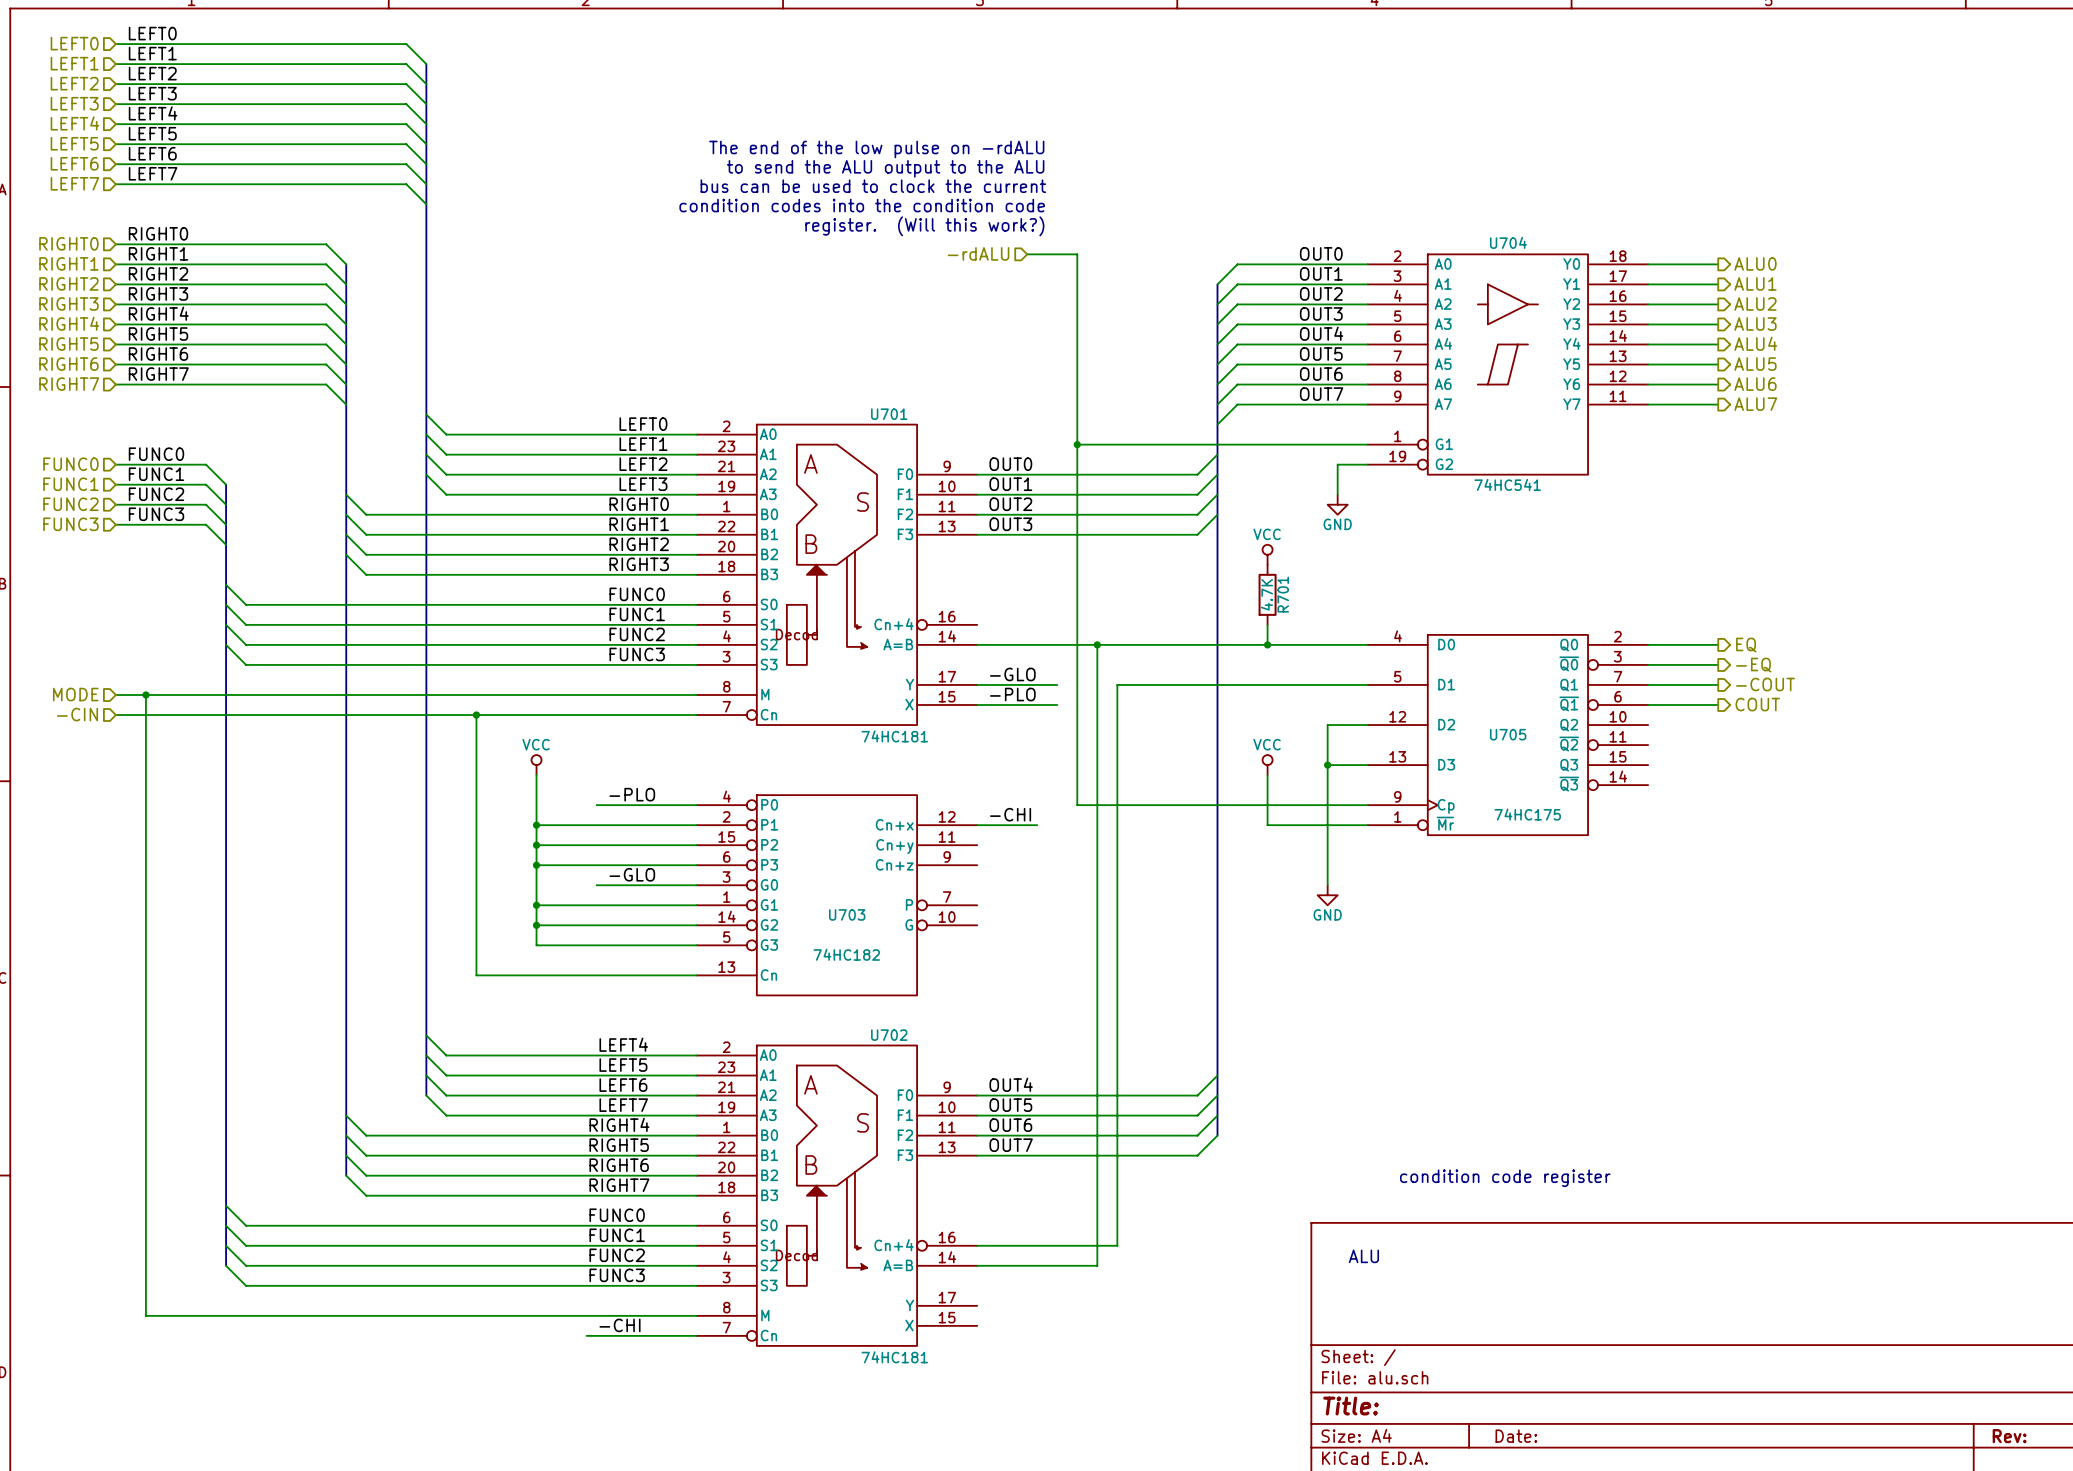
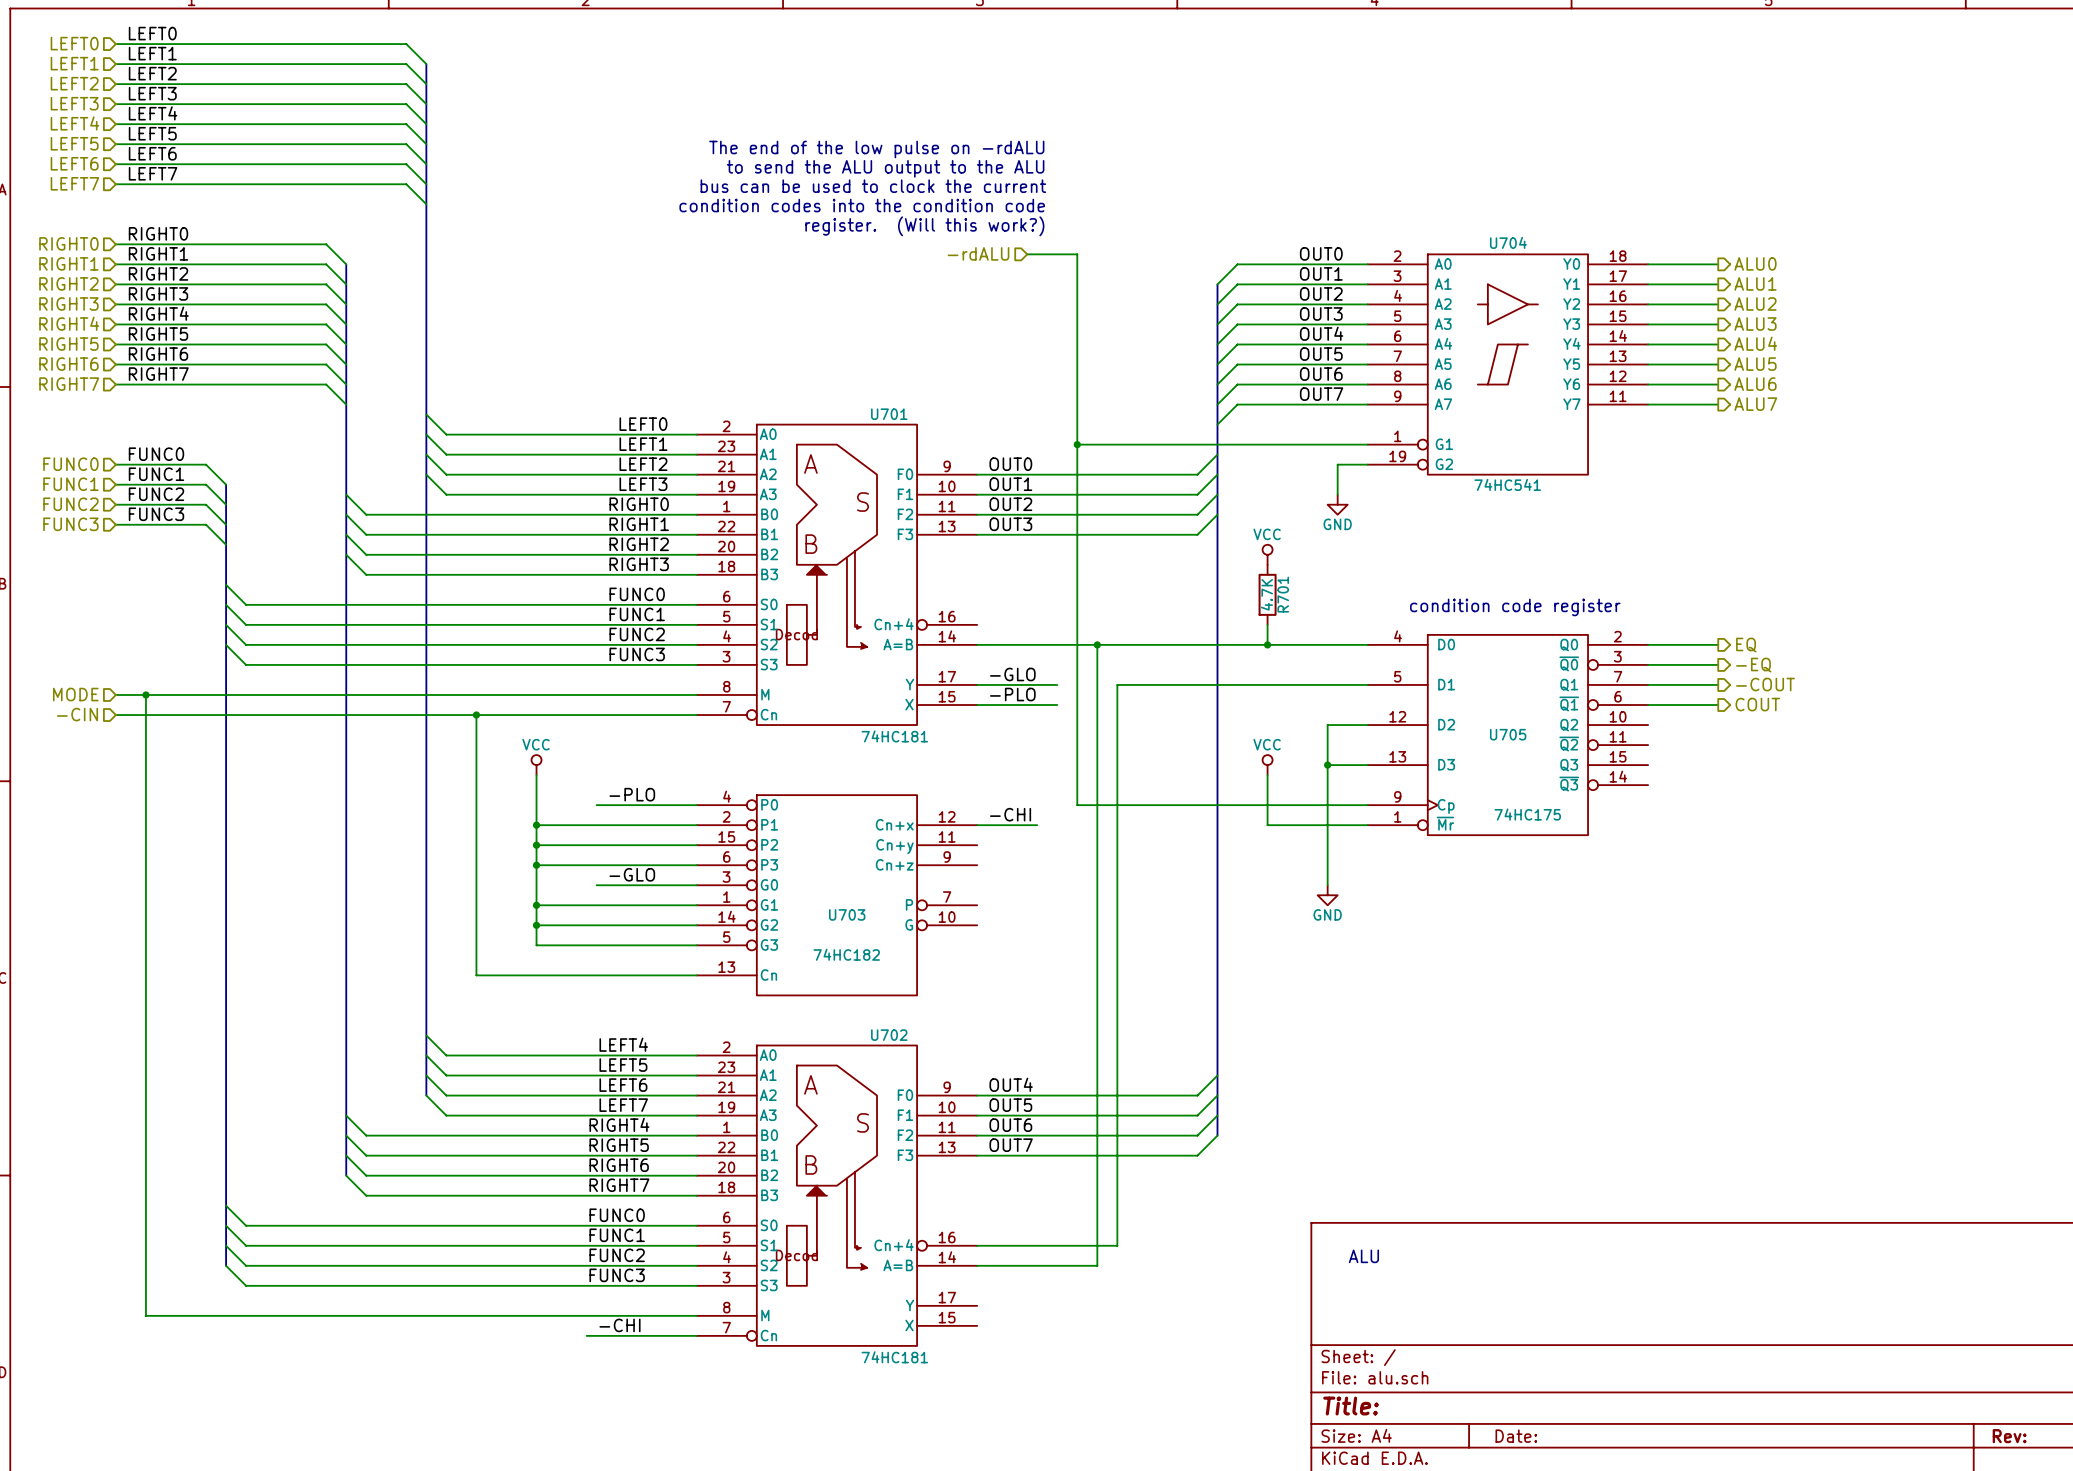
text: none -> condition code register (1515, 607)
text: condition code register (1505, 1178) -> none

